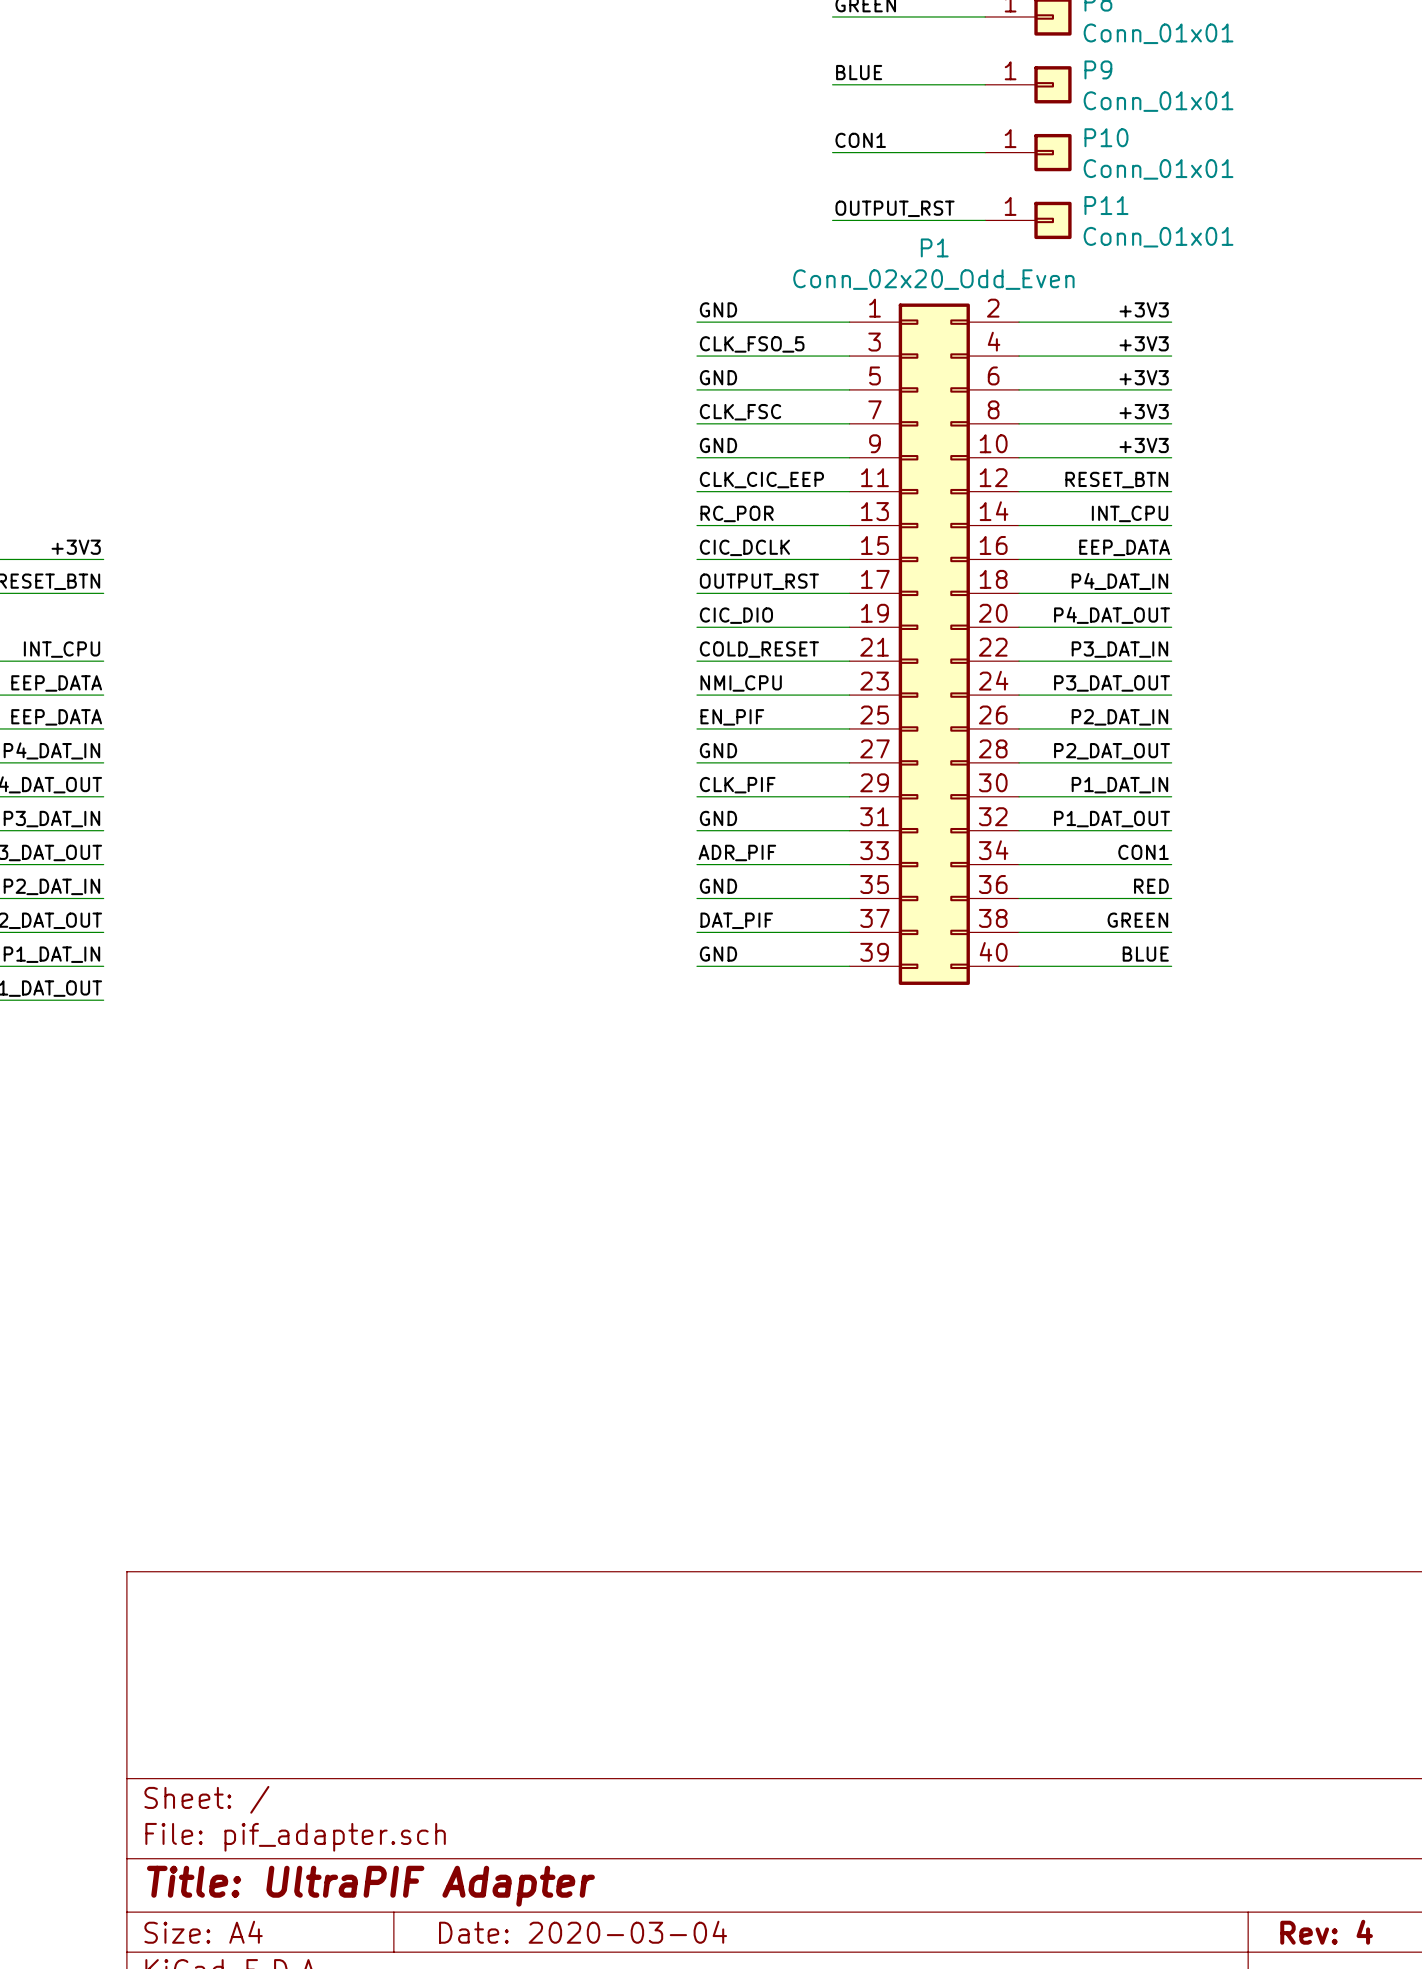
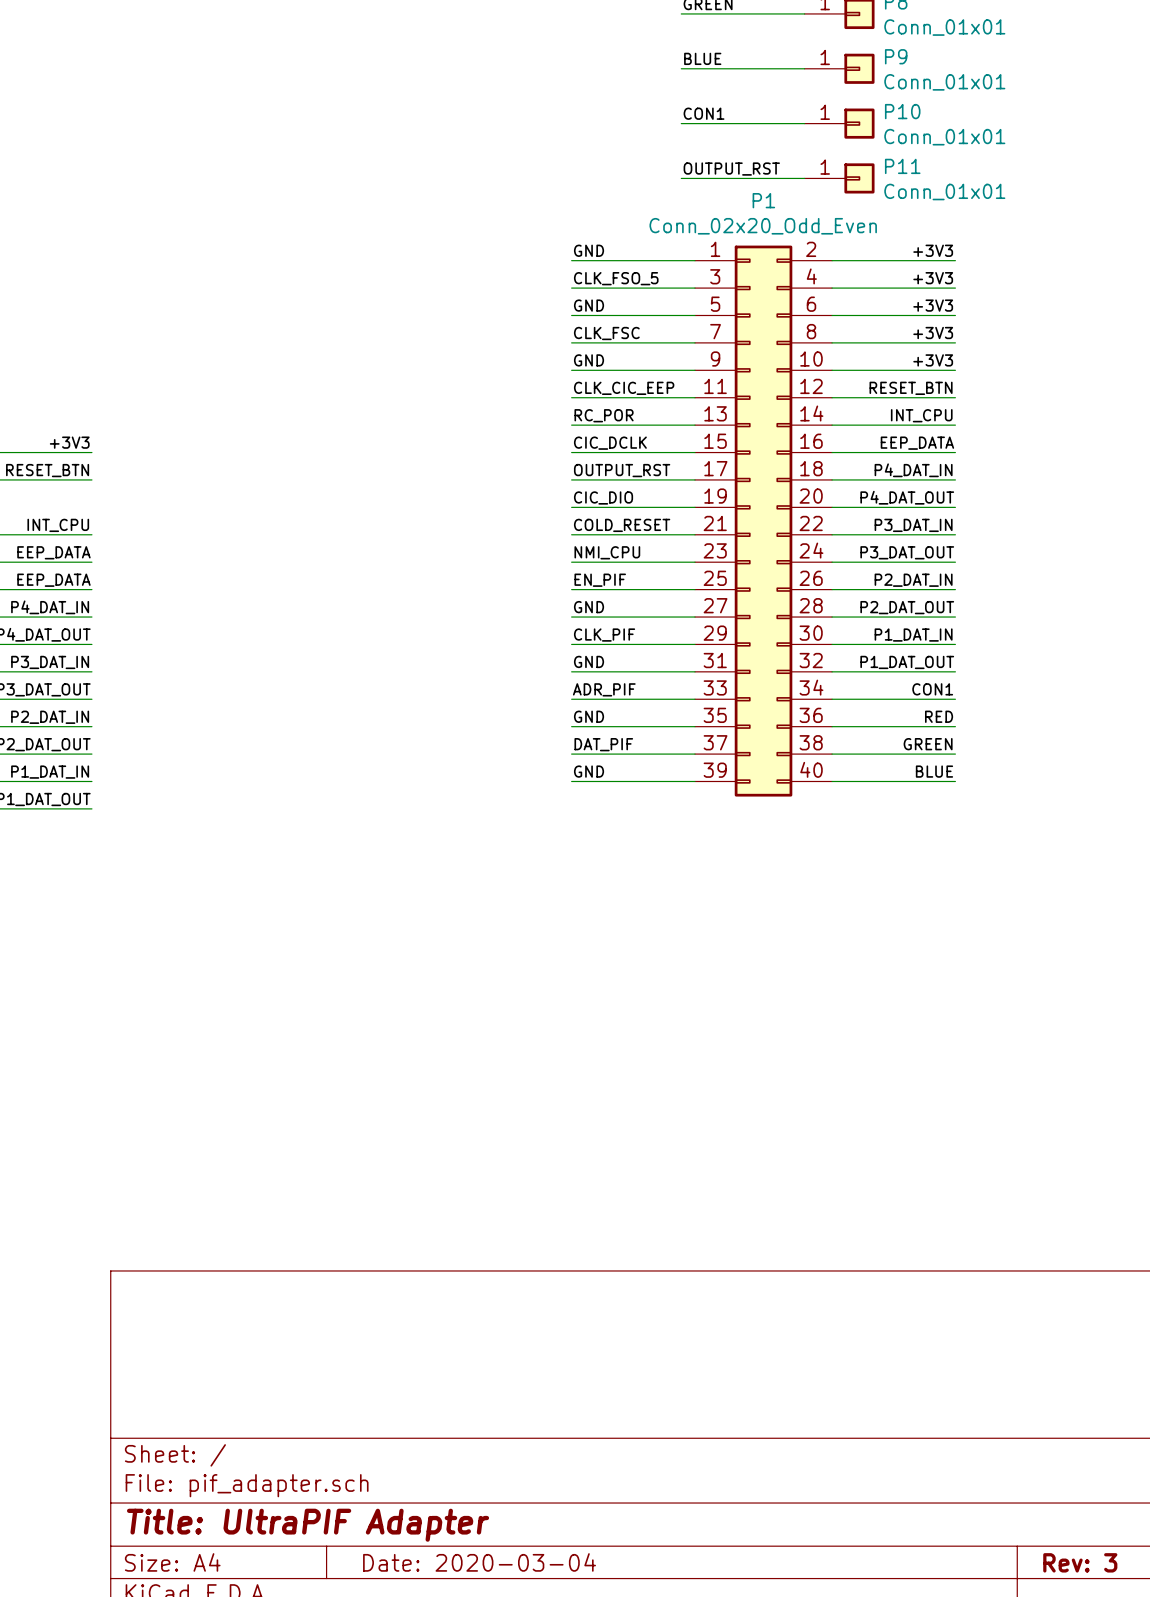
title block: Rev: 4 (1326, 1932) -> Rev: 3 (1080, 1562)

